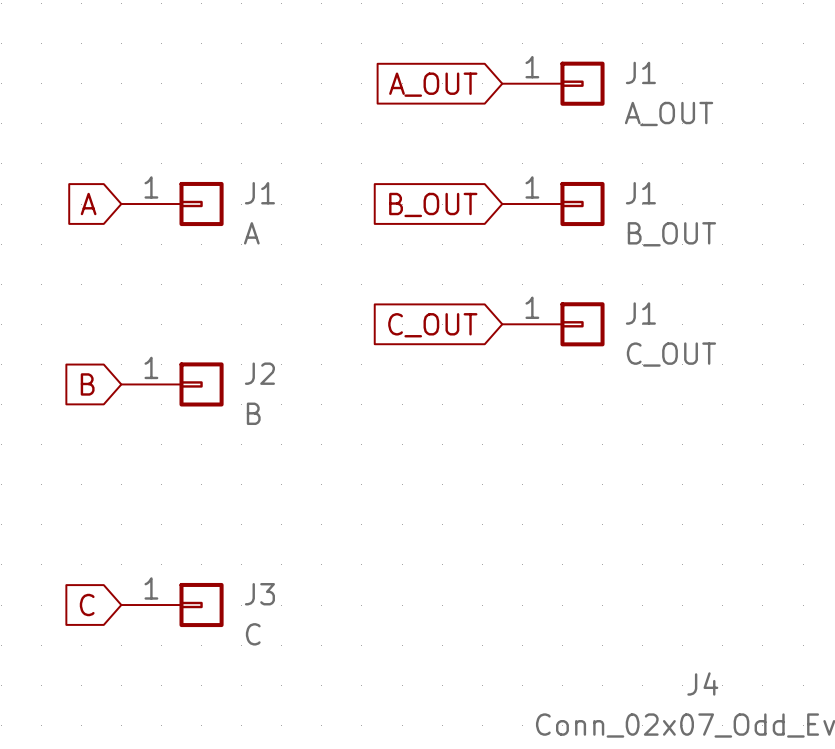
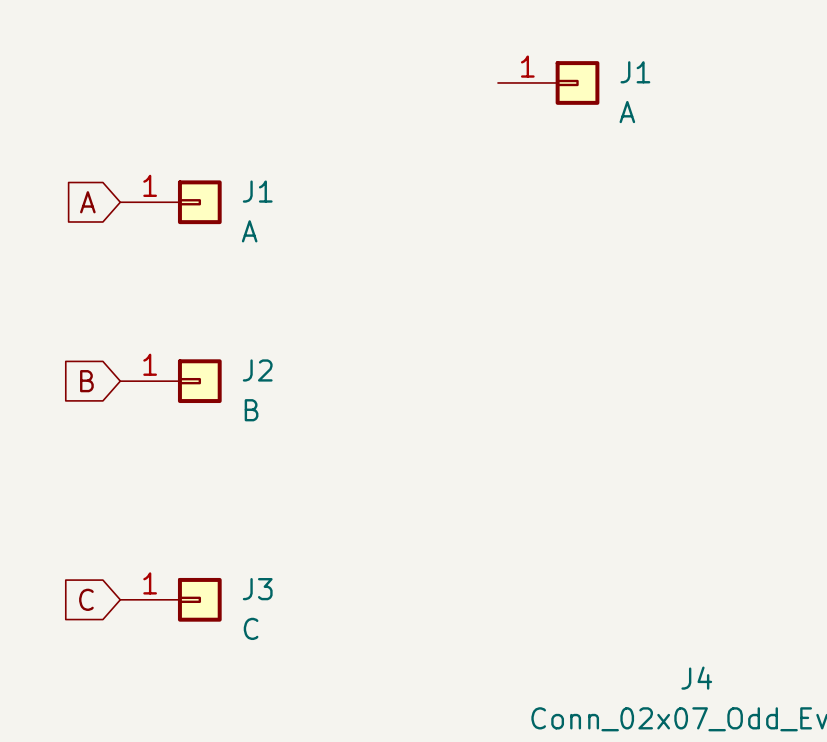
global label: A_OUT (433, 84) -> none
J1 value: A_OUT (669, 113) -> A (627, 112)
global label: B_OUT (433, 204) -> none
J1: B_OUT (553, 204) -> none
J1: C_OUT (553, 324) -> none
global label: C_OUT (432, 325) -> none

